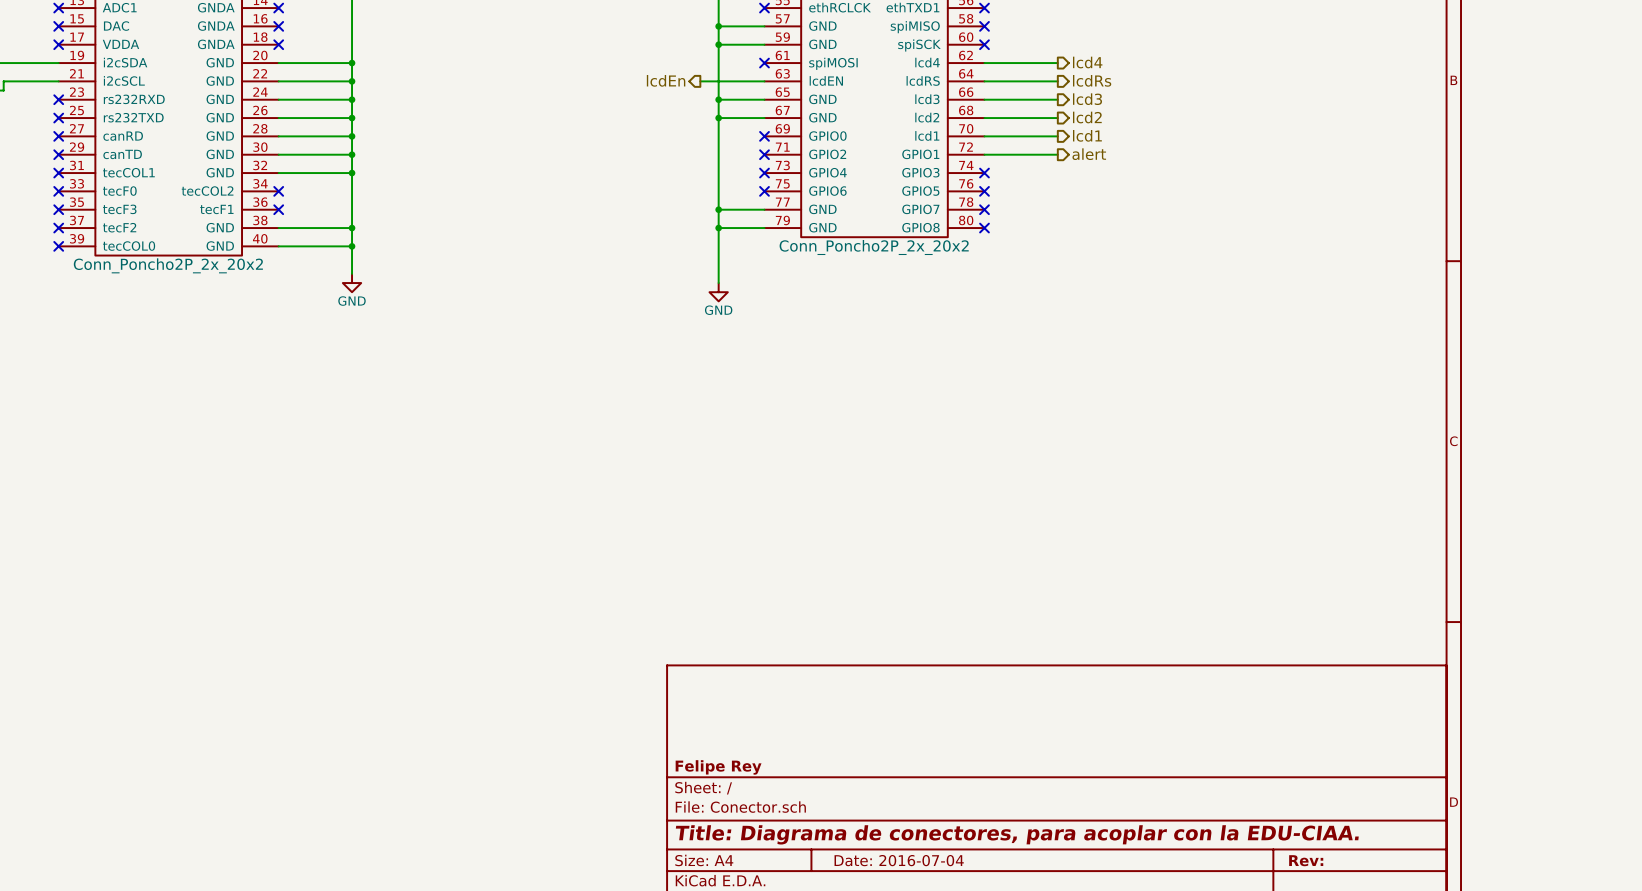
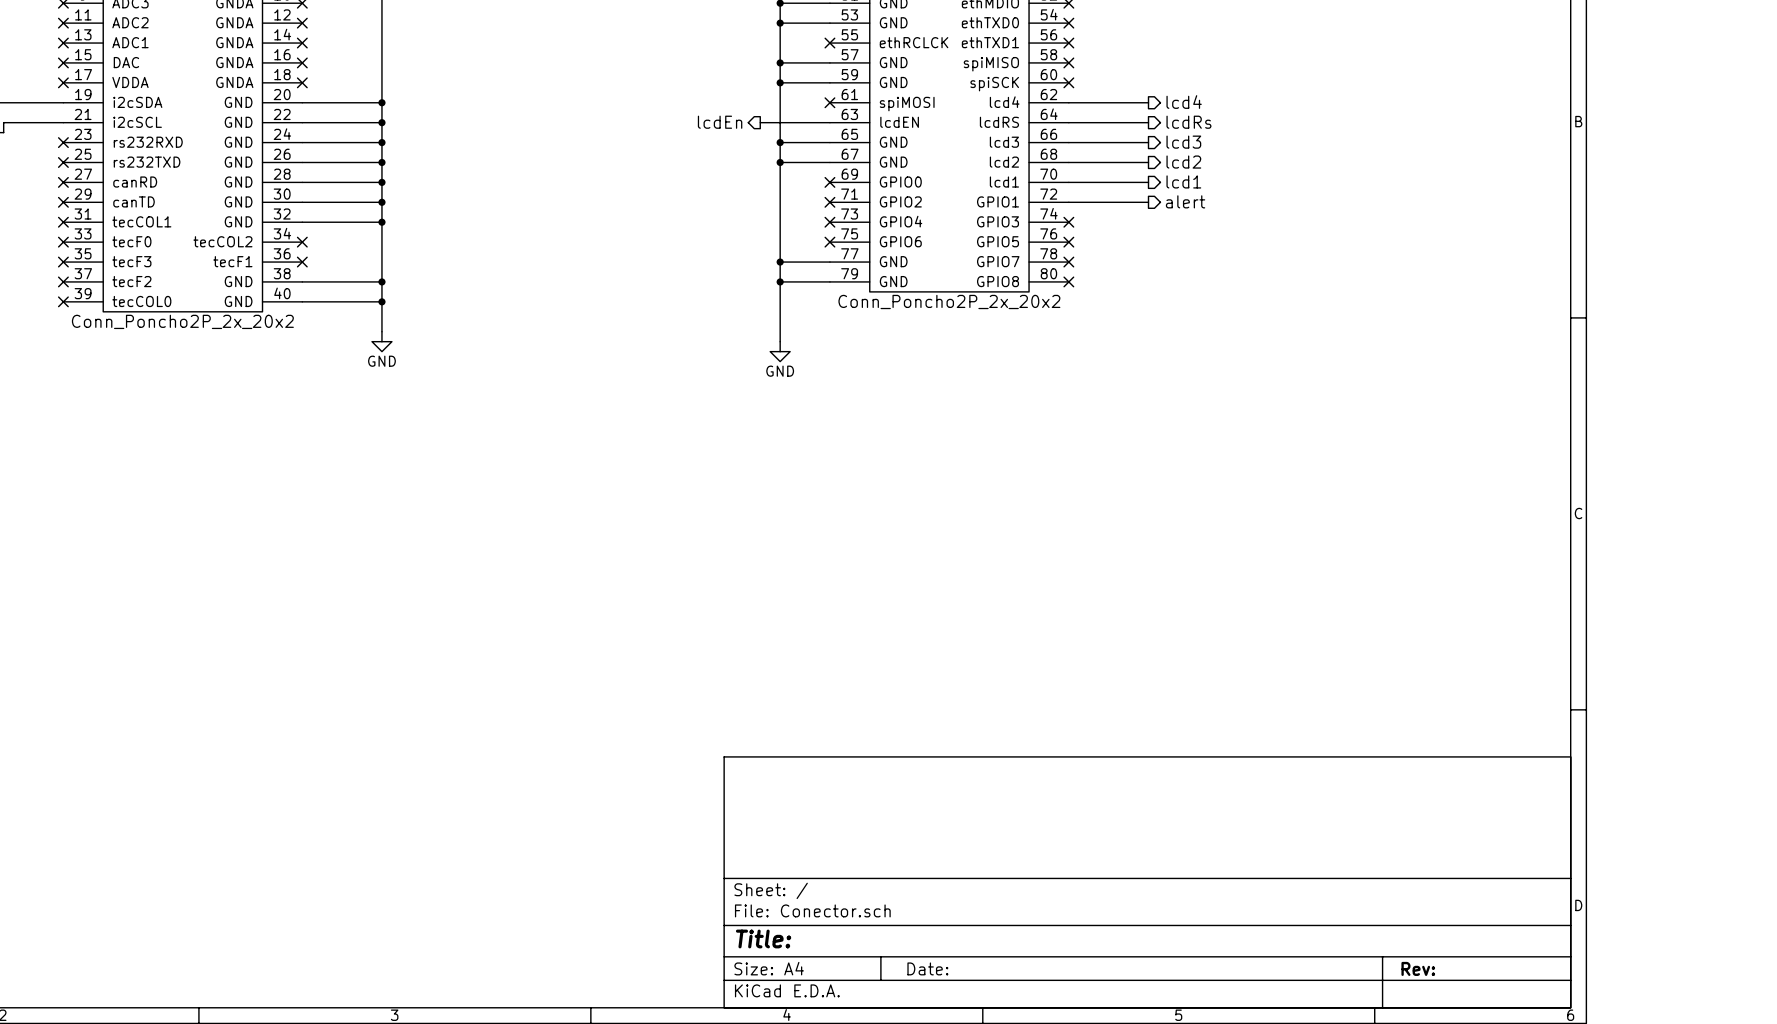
title block: Felipe Rey (718, 767) -> none
title block: Title: Diagrama de conectores, para acoplar con la EDU-CIAA. (1017, 834) -> Title: (763, 938)
title block: Date: 2016-07-04 (899, 860) -> Date: (927, 968)

